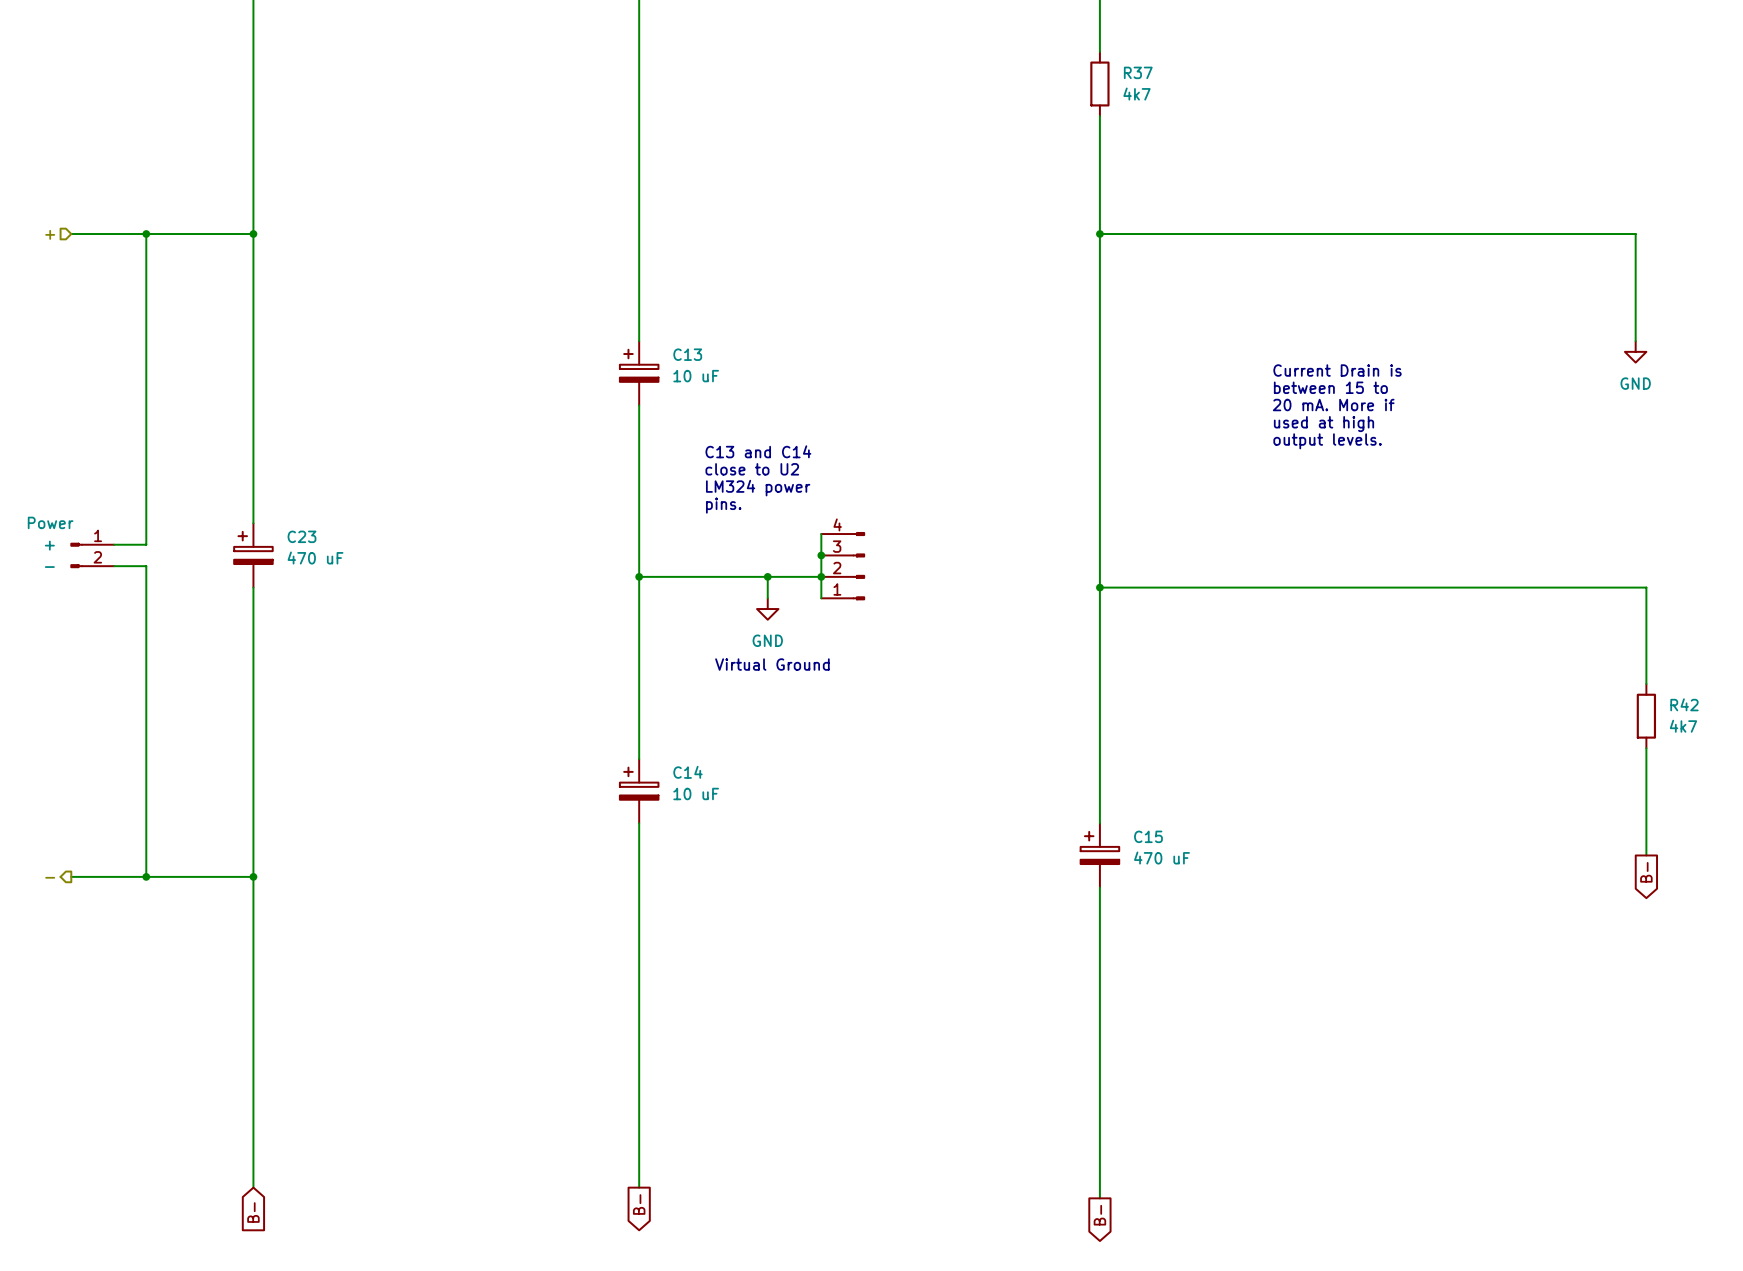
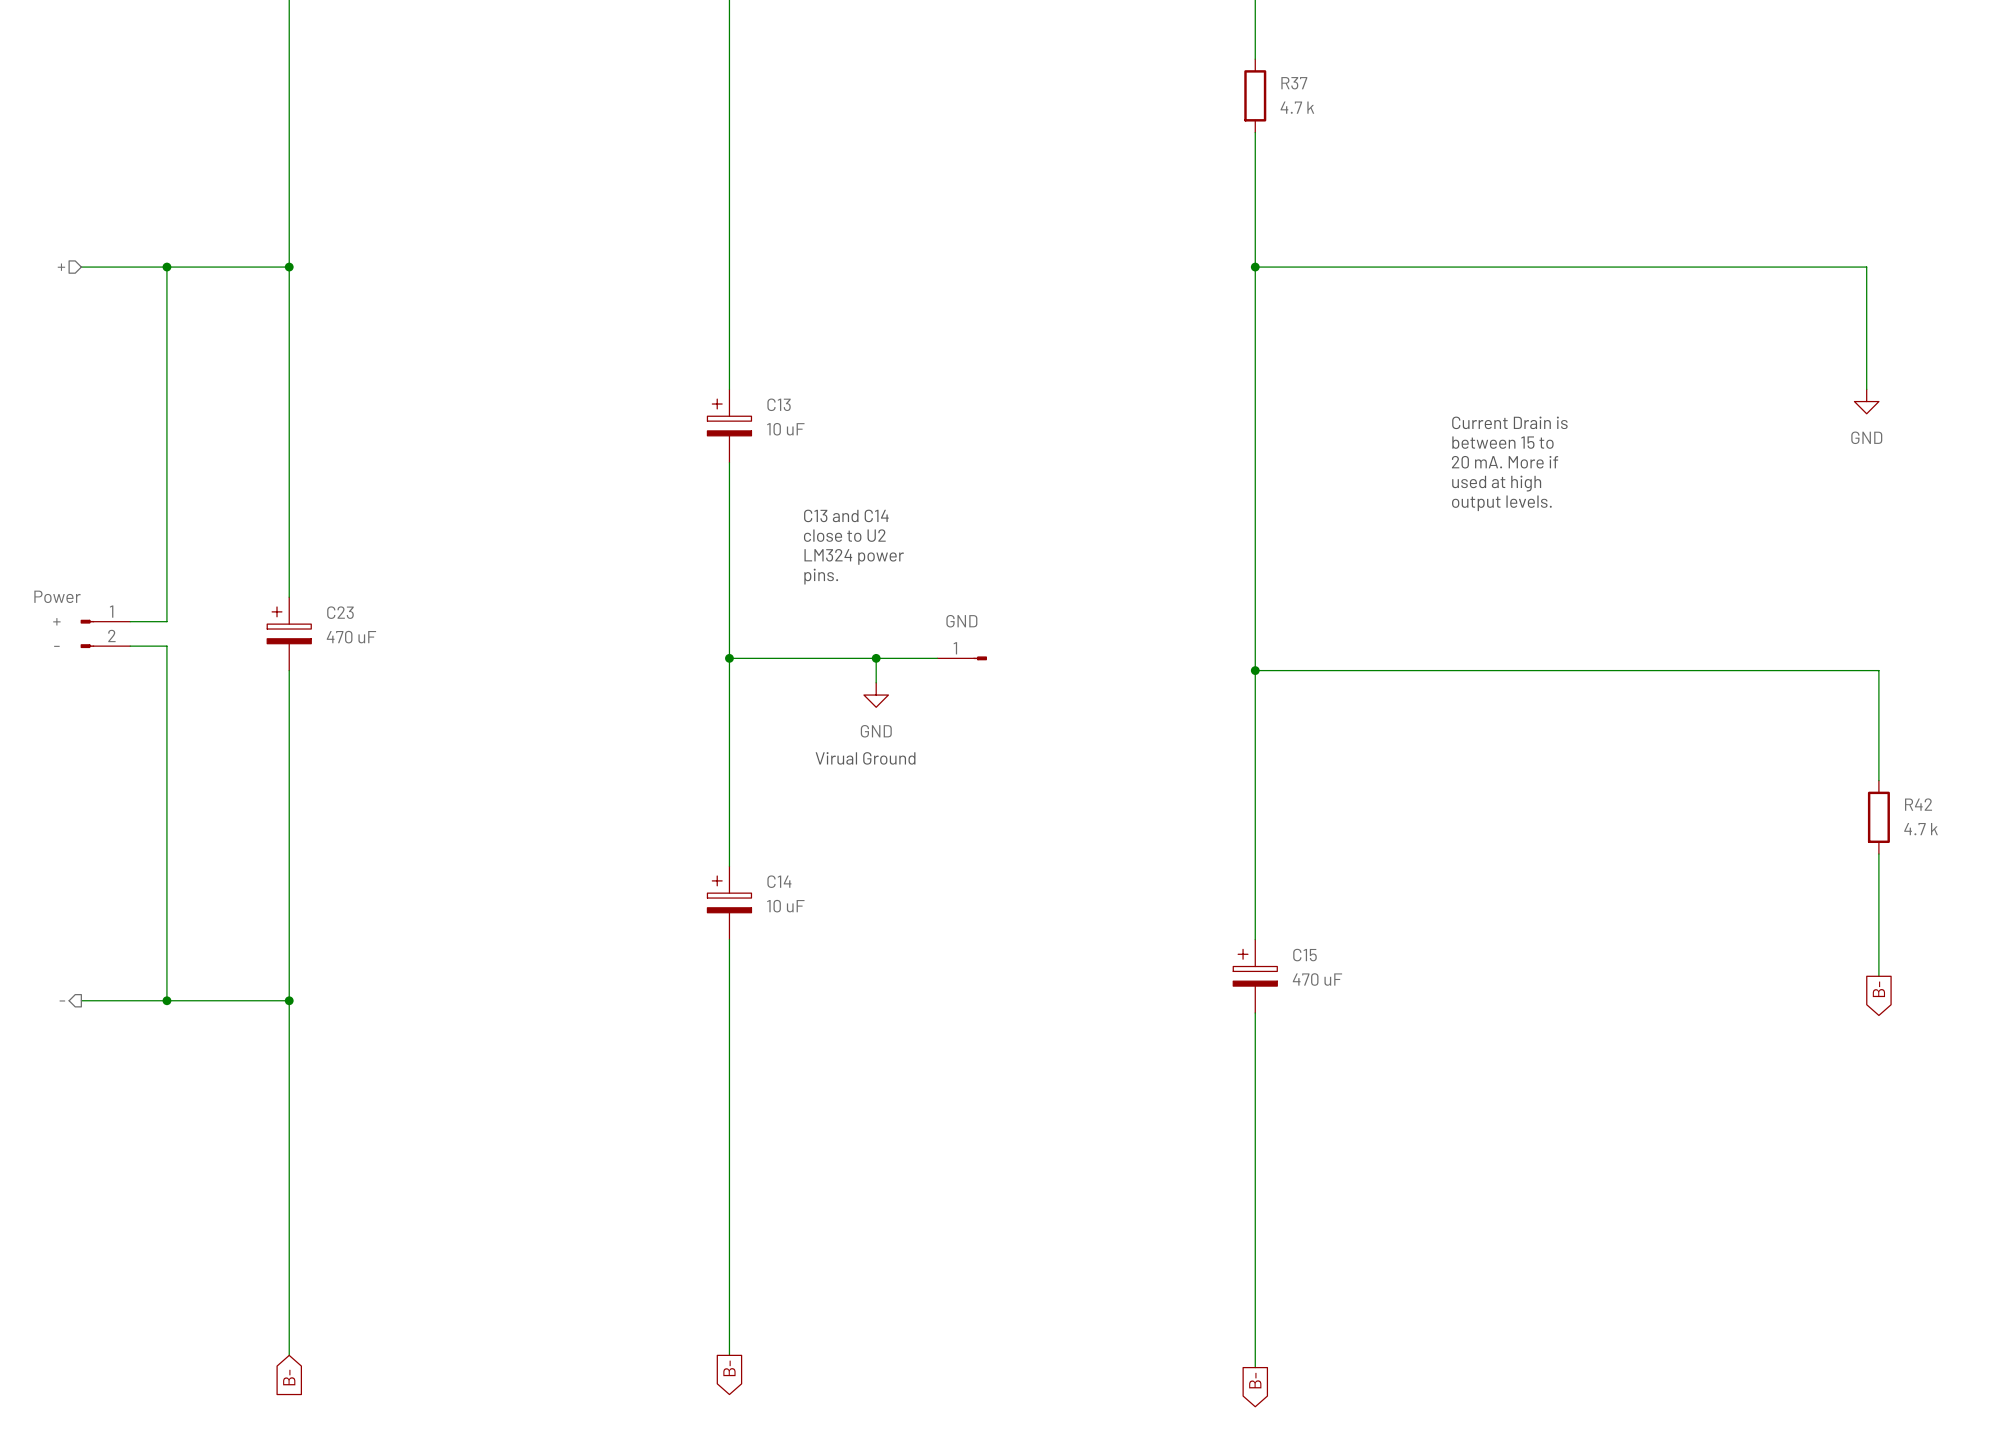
R37 value: 4k7 (1136, 94) -> 4.7 k (1297, 107)
wire: (821, 534) (821, 598) -> none
junction: (821, 555) -> none
part: (843, 566) -> none
junction: (821, 576) -> none
part: none -> GND (962, 658)
text: Virtual Ground (772, 664) -> Virual Ground (865, 758)
R42 value: 4k7 (1683, 726) -> 4.7 k (1921, 829)

